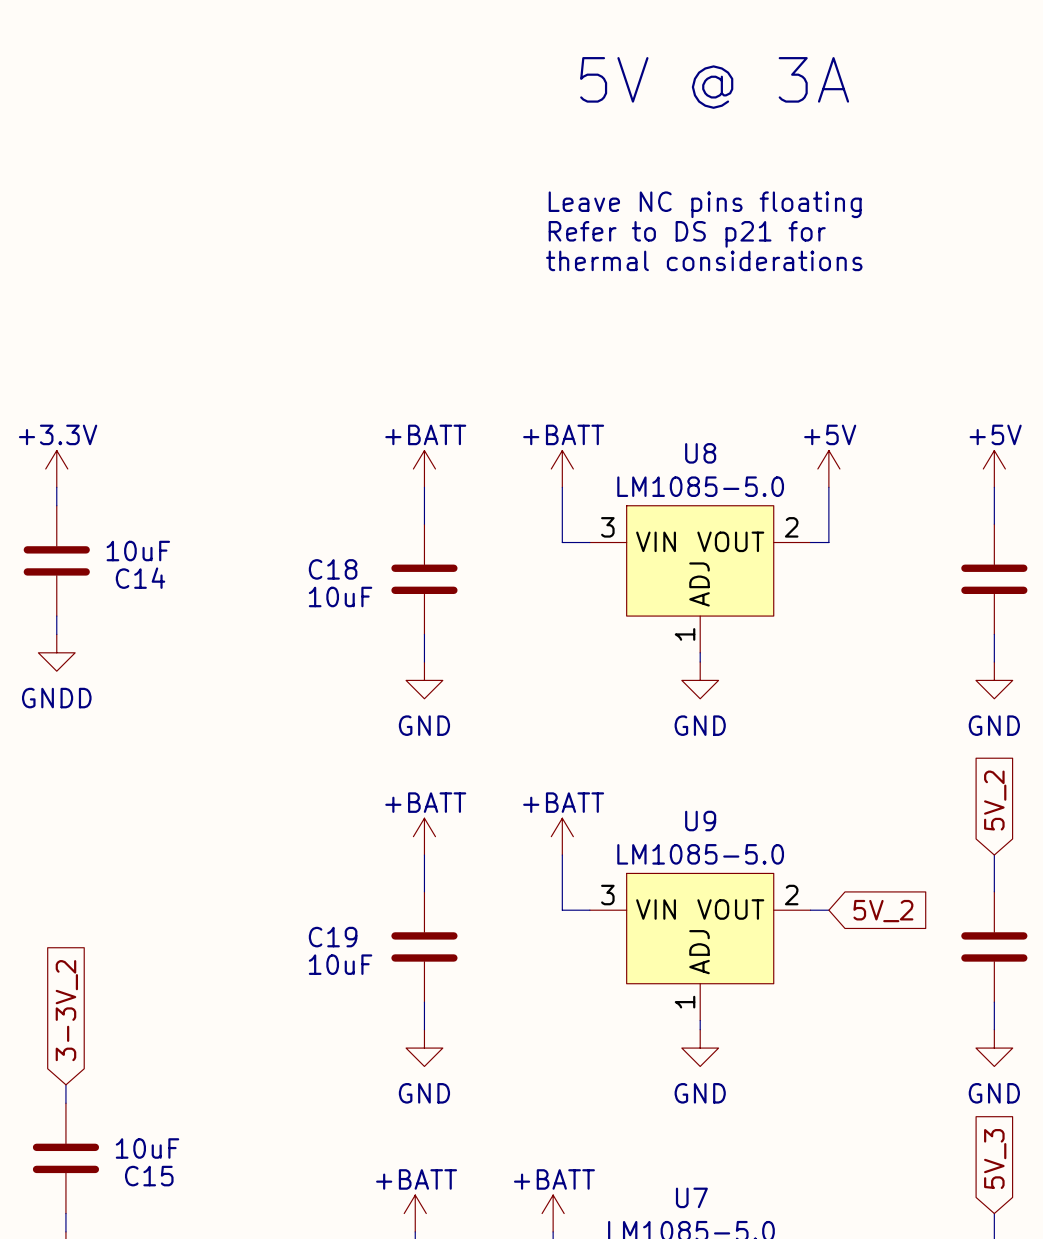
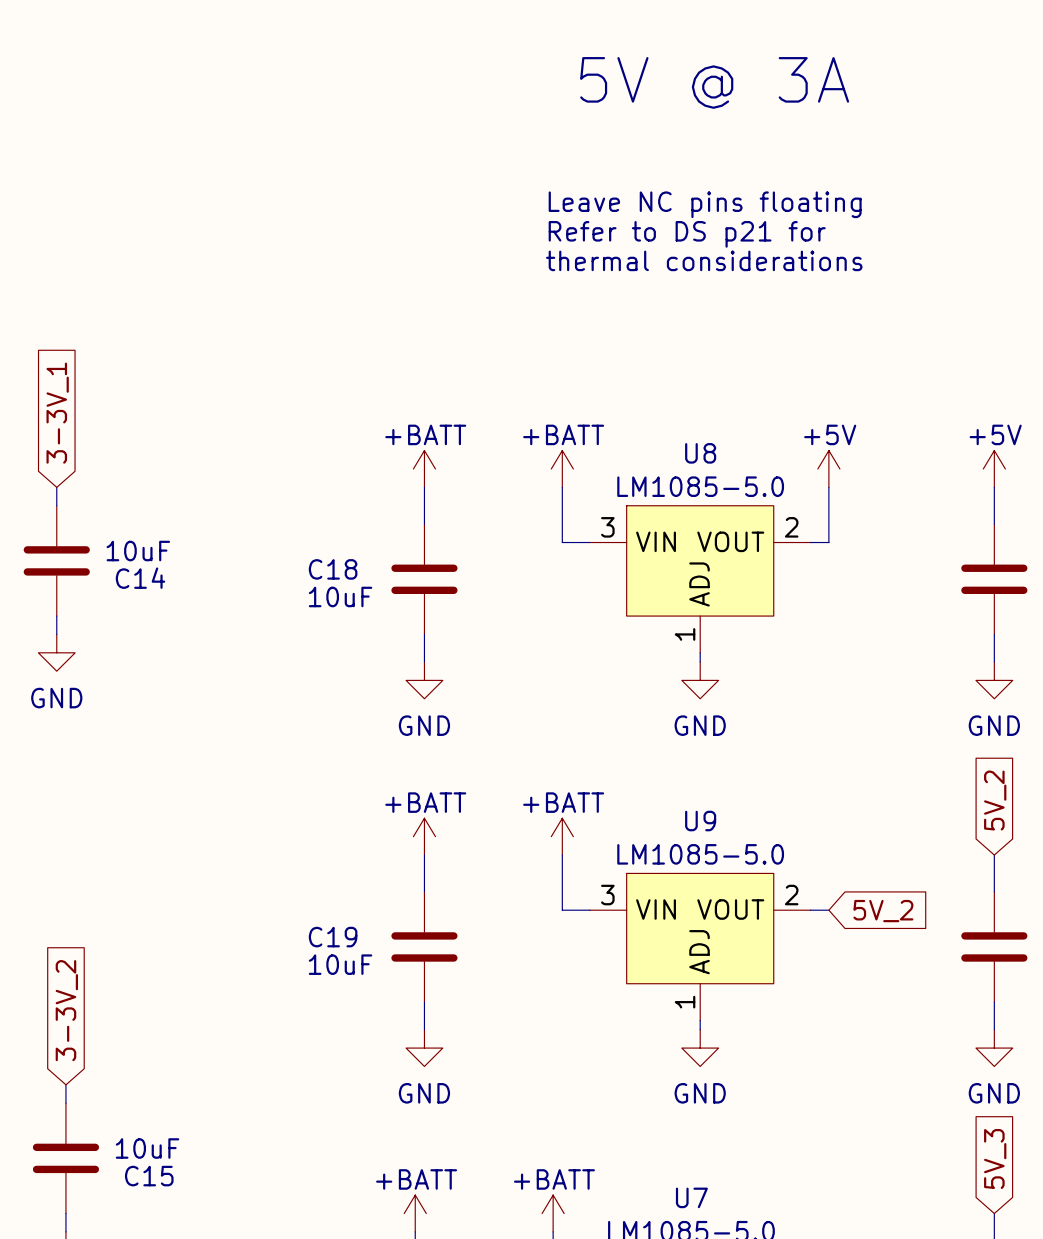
global label: none -> 3-3V_1 (57, 413)
power symbol: +3.3V (56, 468) -> none
power symbol: GNDD (56, 652) -> GND (56, 652)

